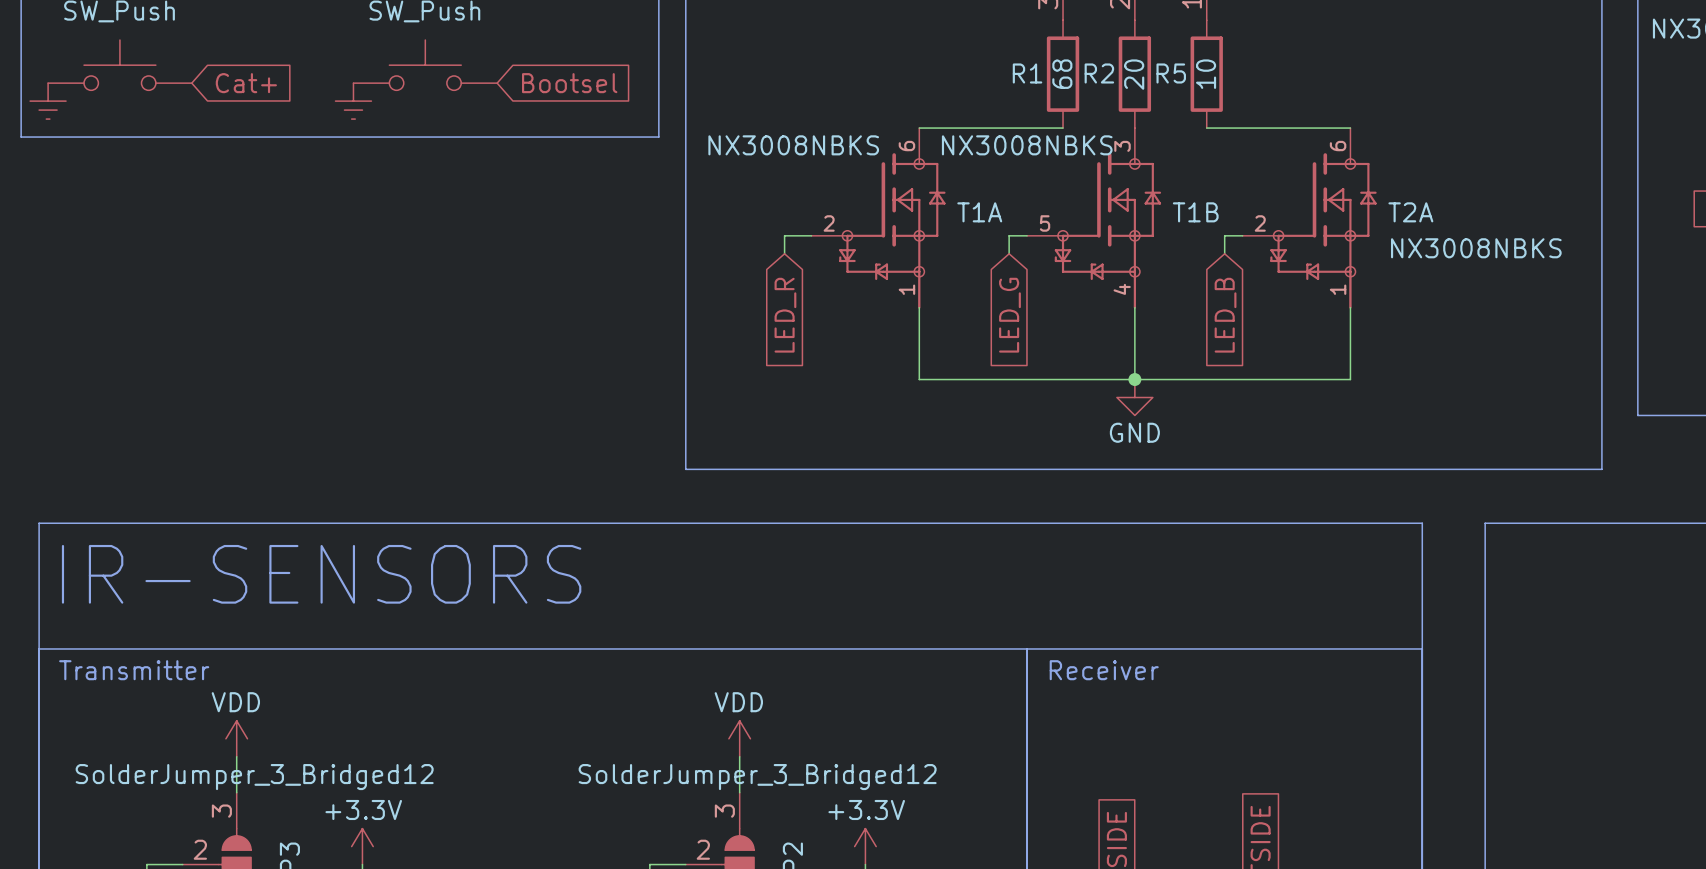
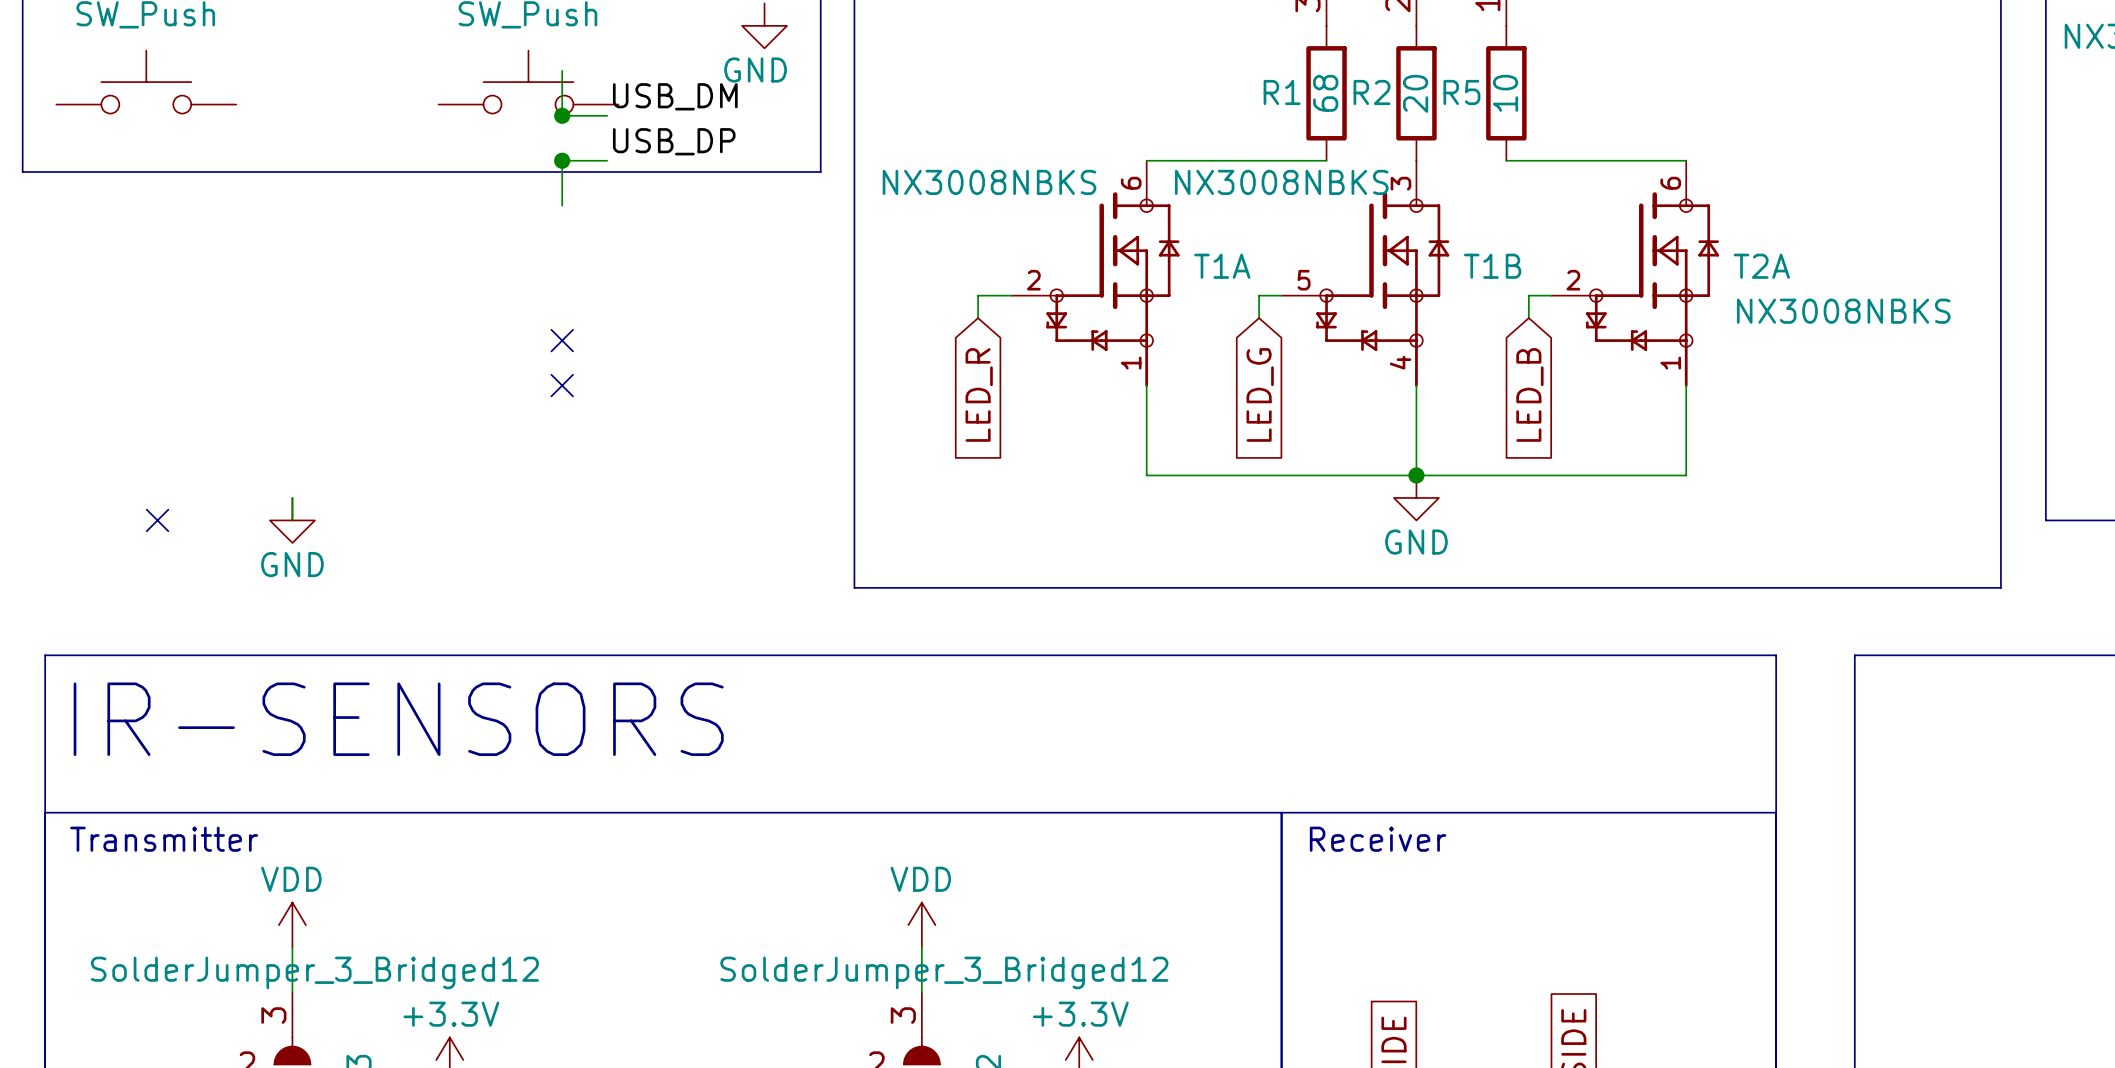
power symbol: none -> GND (764, 25)
wire: none -> (562, 70) (562, 115) (607, 115)
label: none -> USB_DM (675, 96)
global label: Cat+ (246, 83) -> none
global label: Bootsel (569, 83) -> none
junction: none -> (562, 115)
power symbol: (48, 101) -> none
power symbol: (353, 101) -> none
label: none -> USB_DP (674, 141)
junction: none -> (562, 160)
wire: none -> (607, 160) (562, 160) (562, 205)
no-connect mark: none -> (562, 340)
no-connect mark: none -> (562, 385)
wire: none -> (292, 497) (292, 520)
no-connect mark: none -> (157, 520)
power symbol: none -> GND (292, 520)

